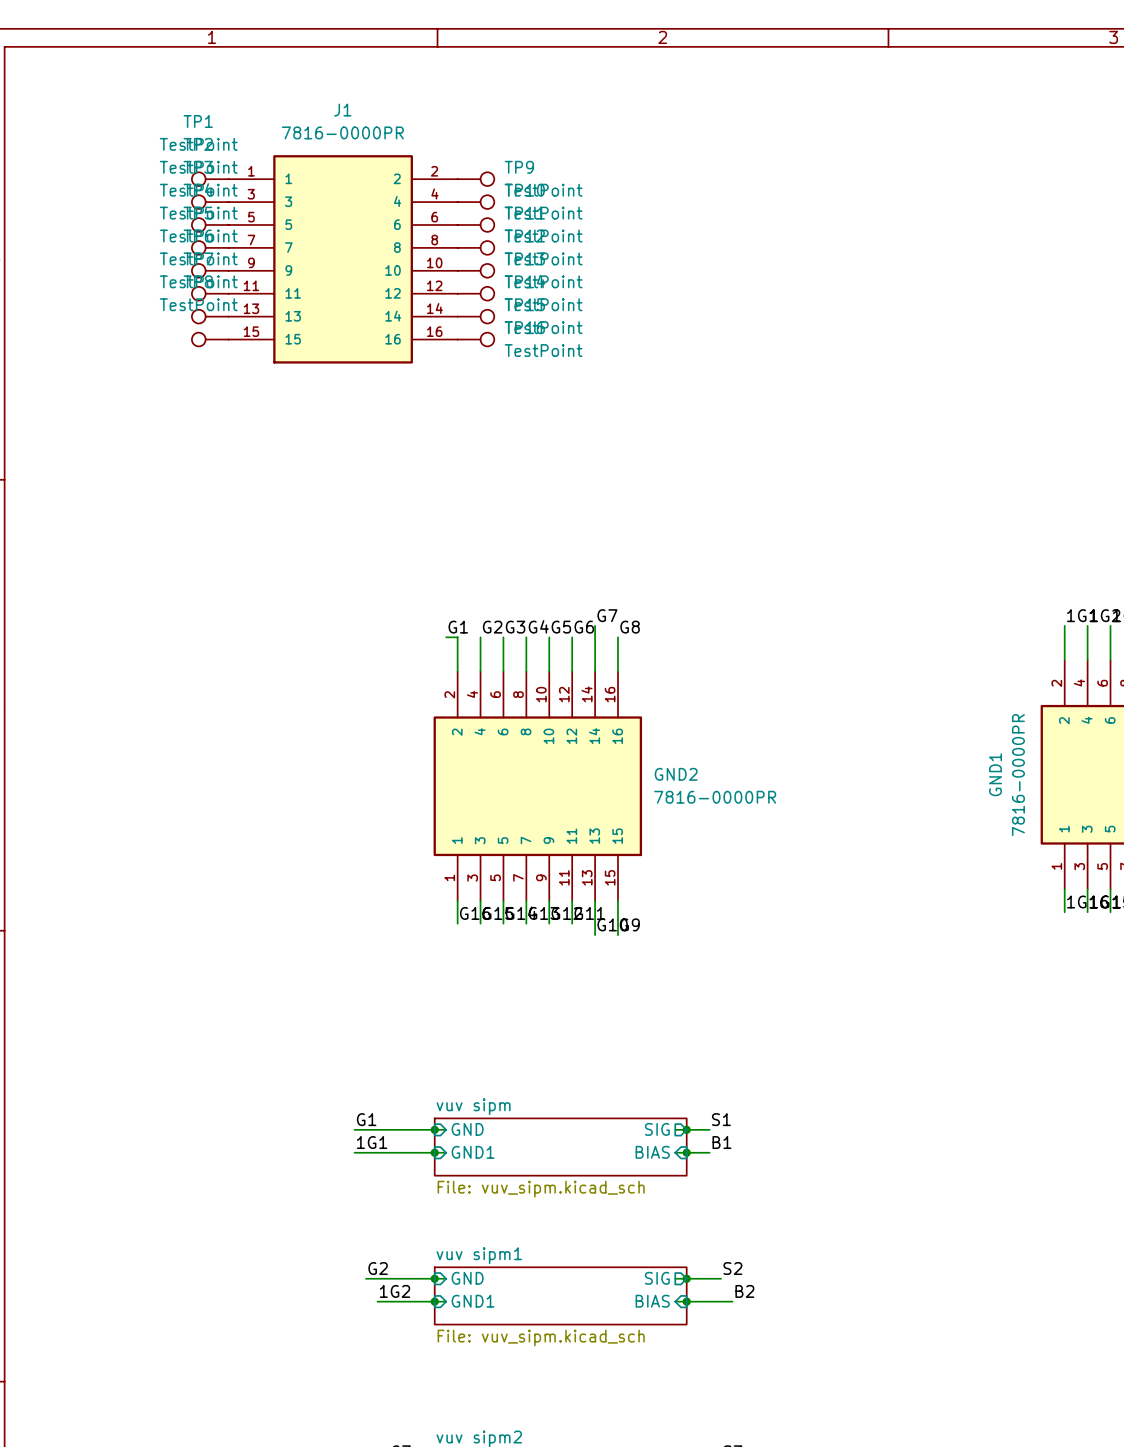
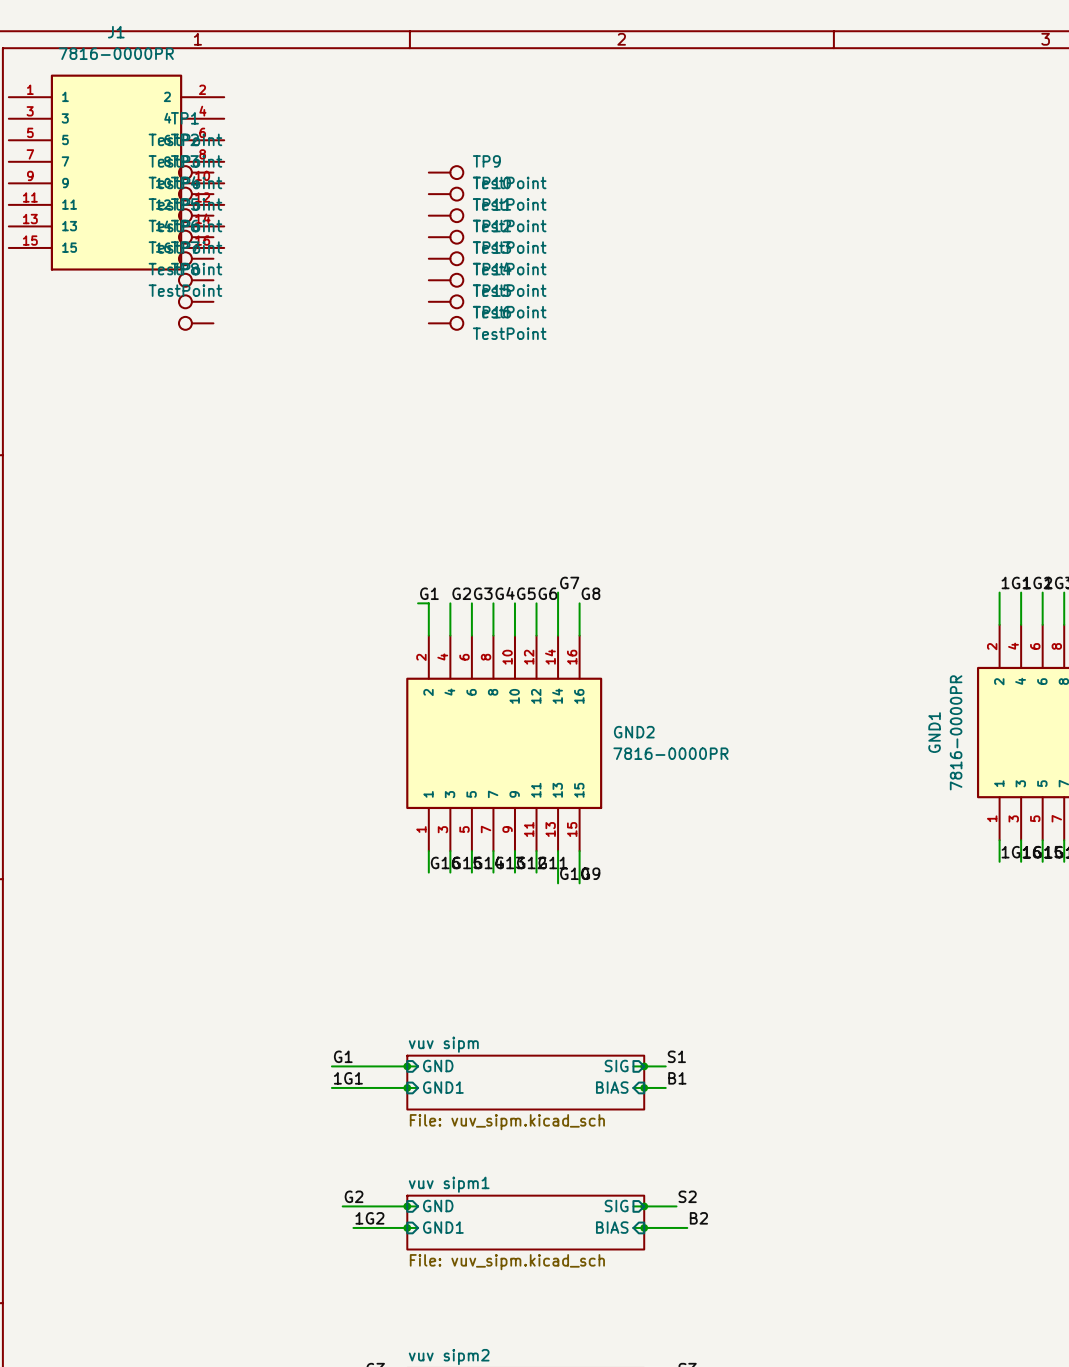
J1 position: (343, 259) -> (116, 172)

